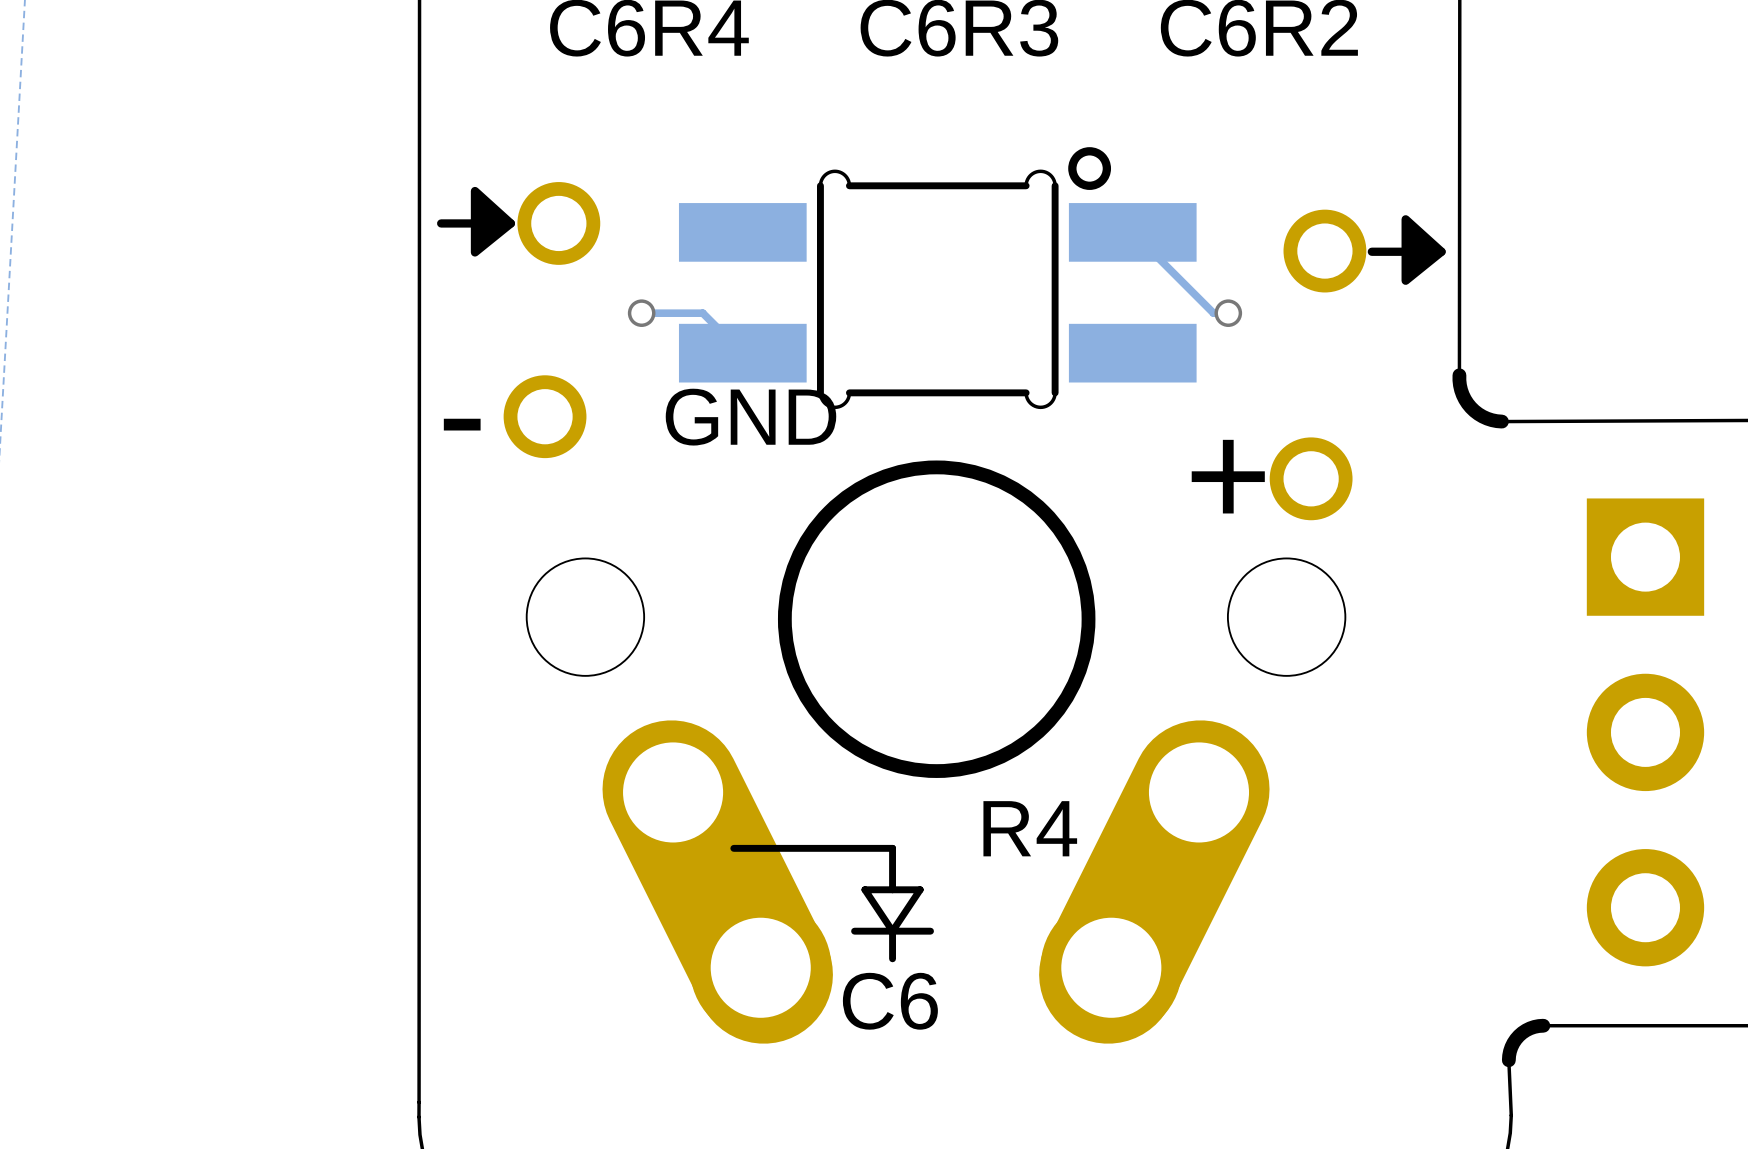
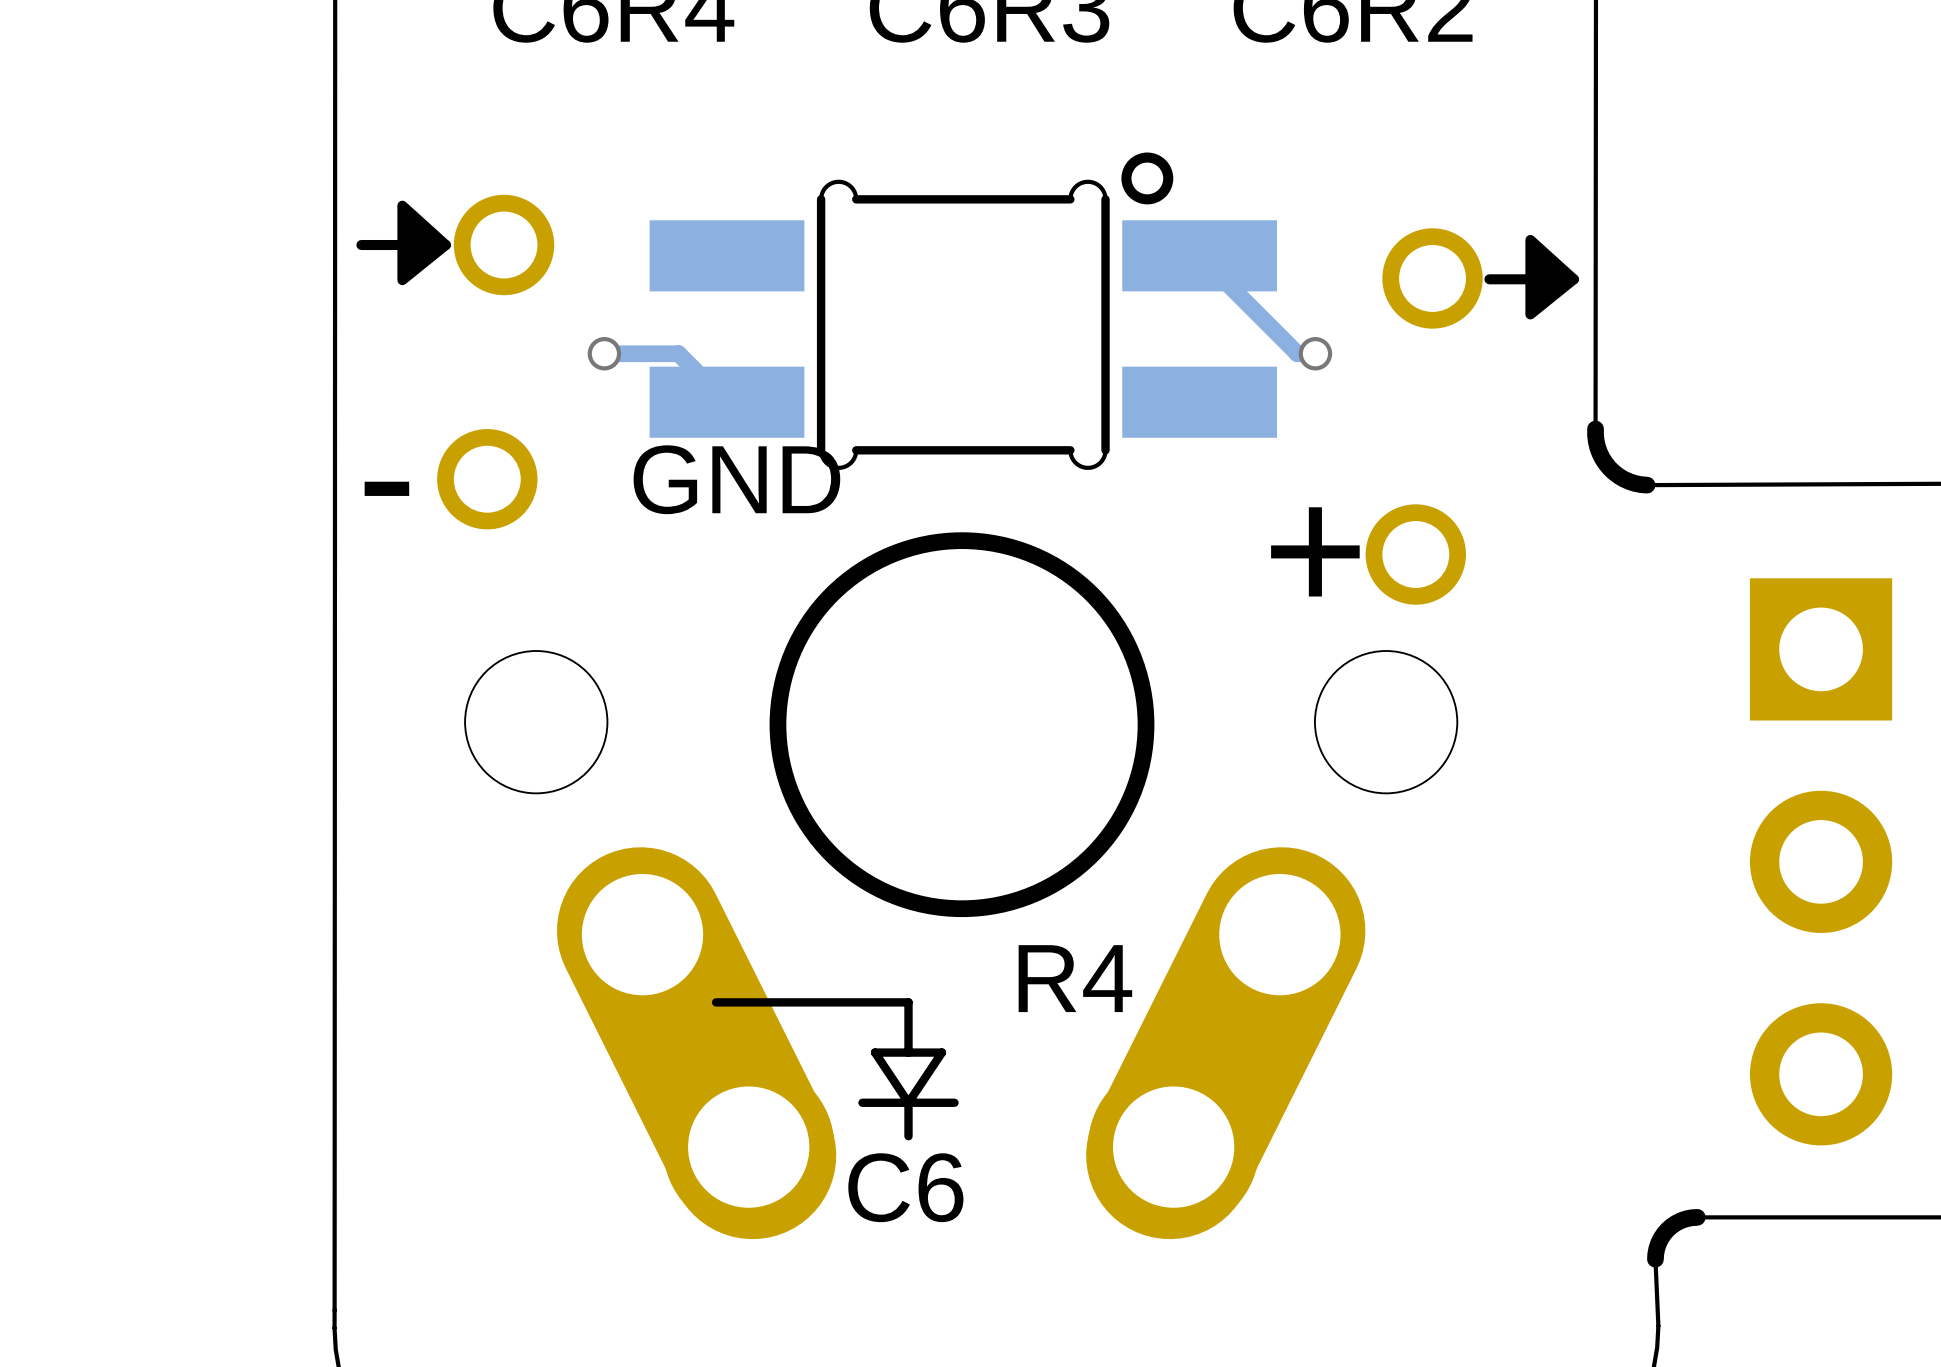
track width: thin (1132, 232) (1213, 313) (1228, 313) -> thick (1199, 255) (1297, 353) (1315, 353)
track width: thin (641, 313) (702, 313) (742, 353) -> thick (604, 353) (678, 353) (727, 402)

